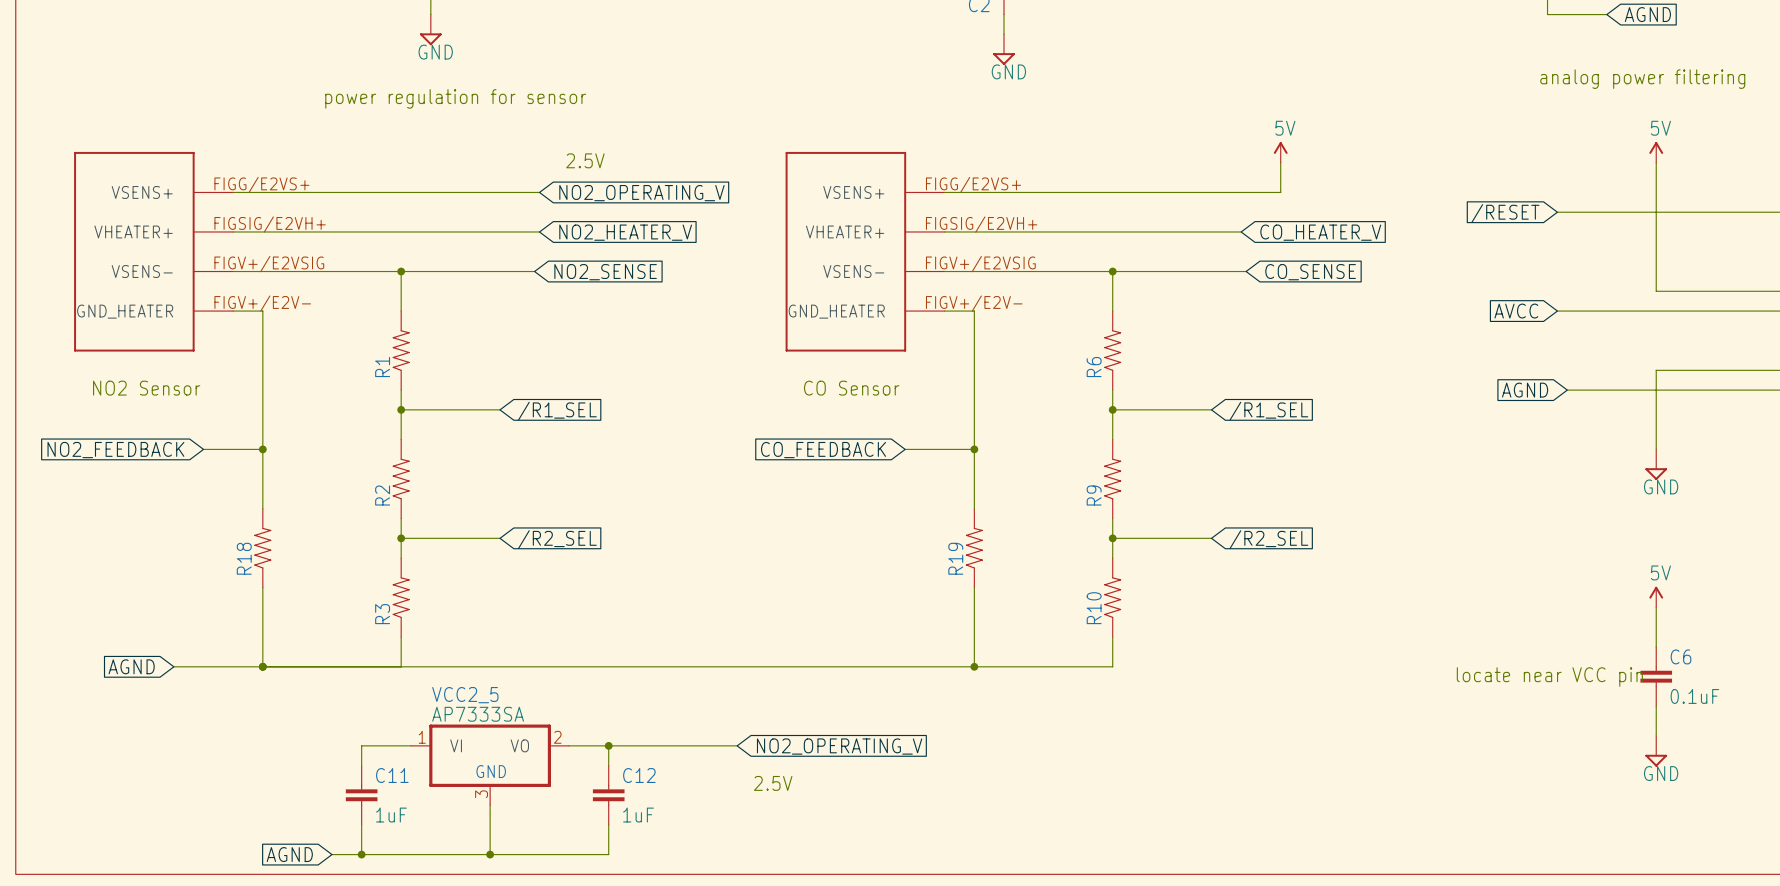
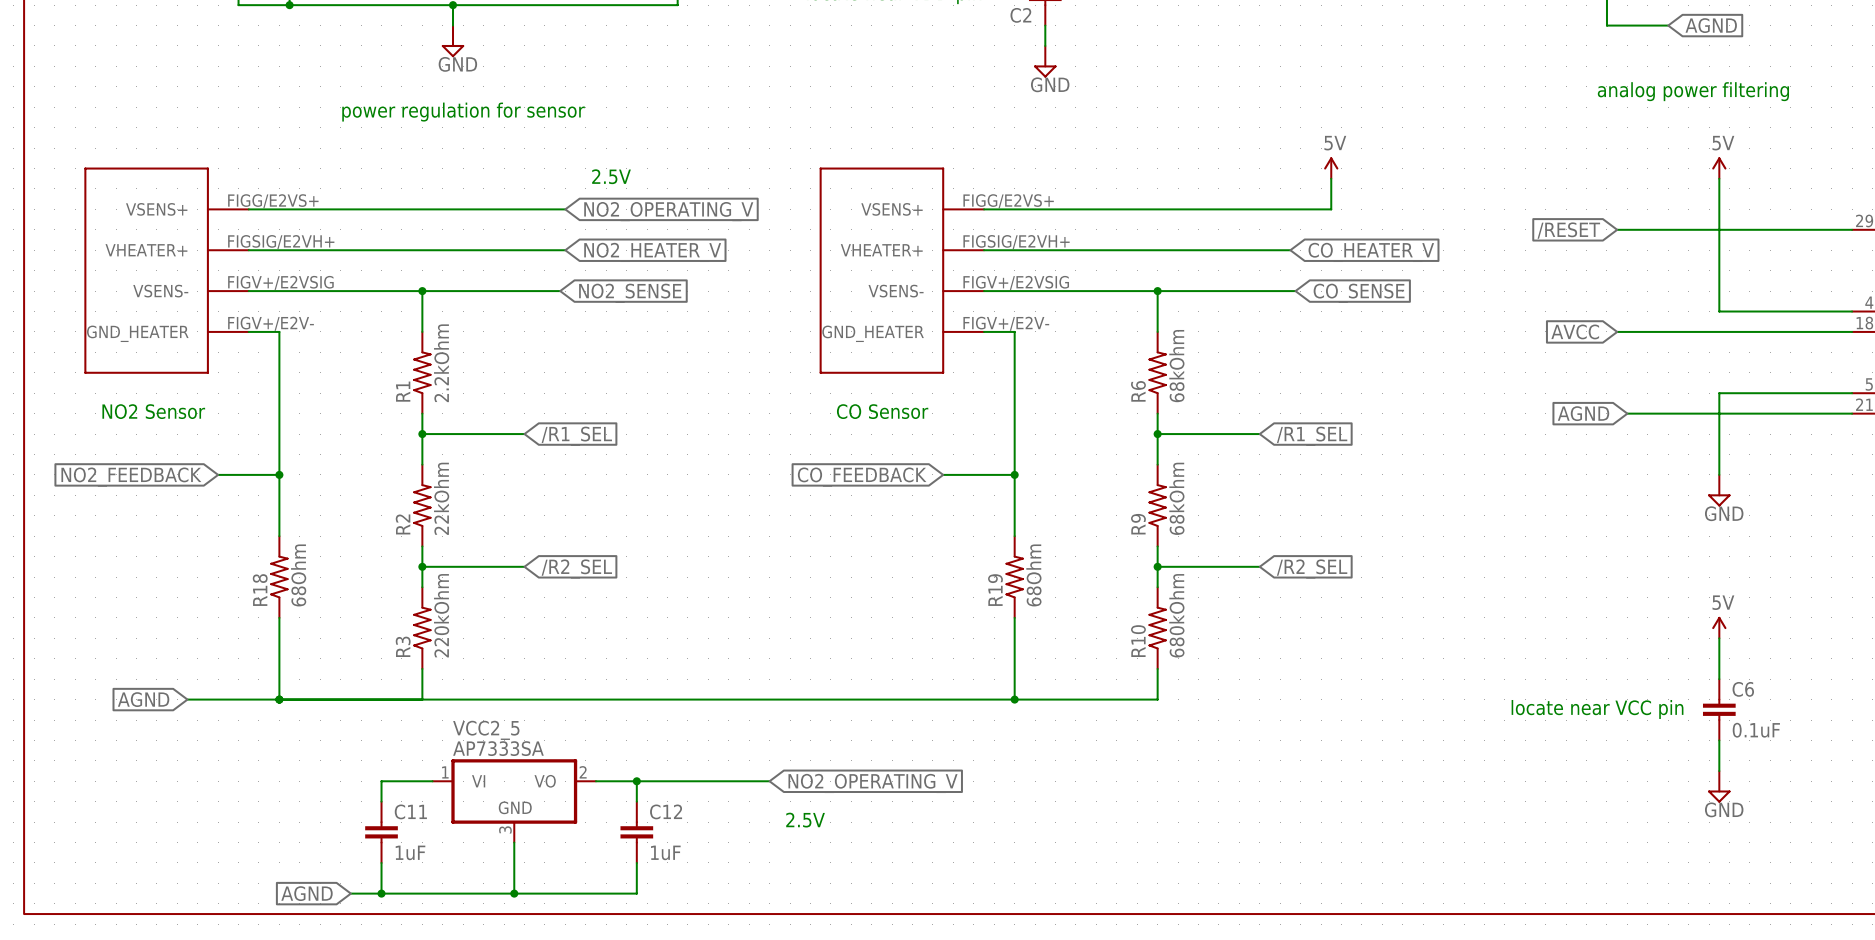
R1 value: none -> 2.2kOhm (441, 363)
R6 value: none -> 68kOhm (1176, 366)
R9 value: none -> 68kOhm (1176, 498)
R2 value: none -> 22kOhm (441, 498)
R18 value: none -> 68Ohm (298, 575)
R19 value: none -> 68Ohm (1033, 575)
R3 value: none -> 220kOhm (441, 615)
R10 value: none -> 680kOhm (1176, 615)

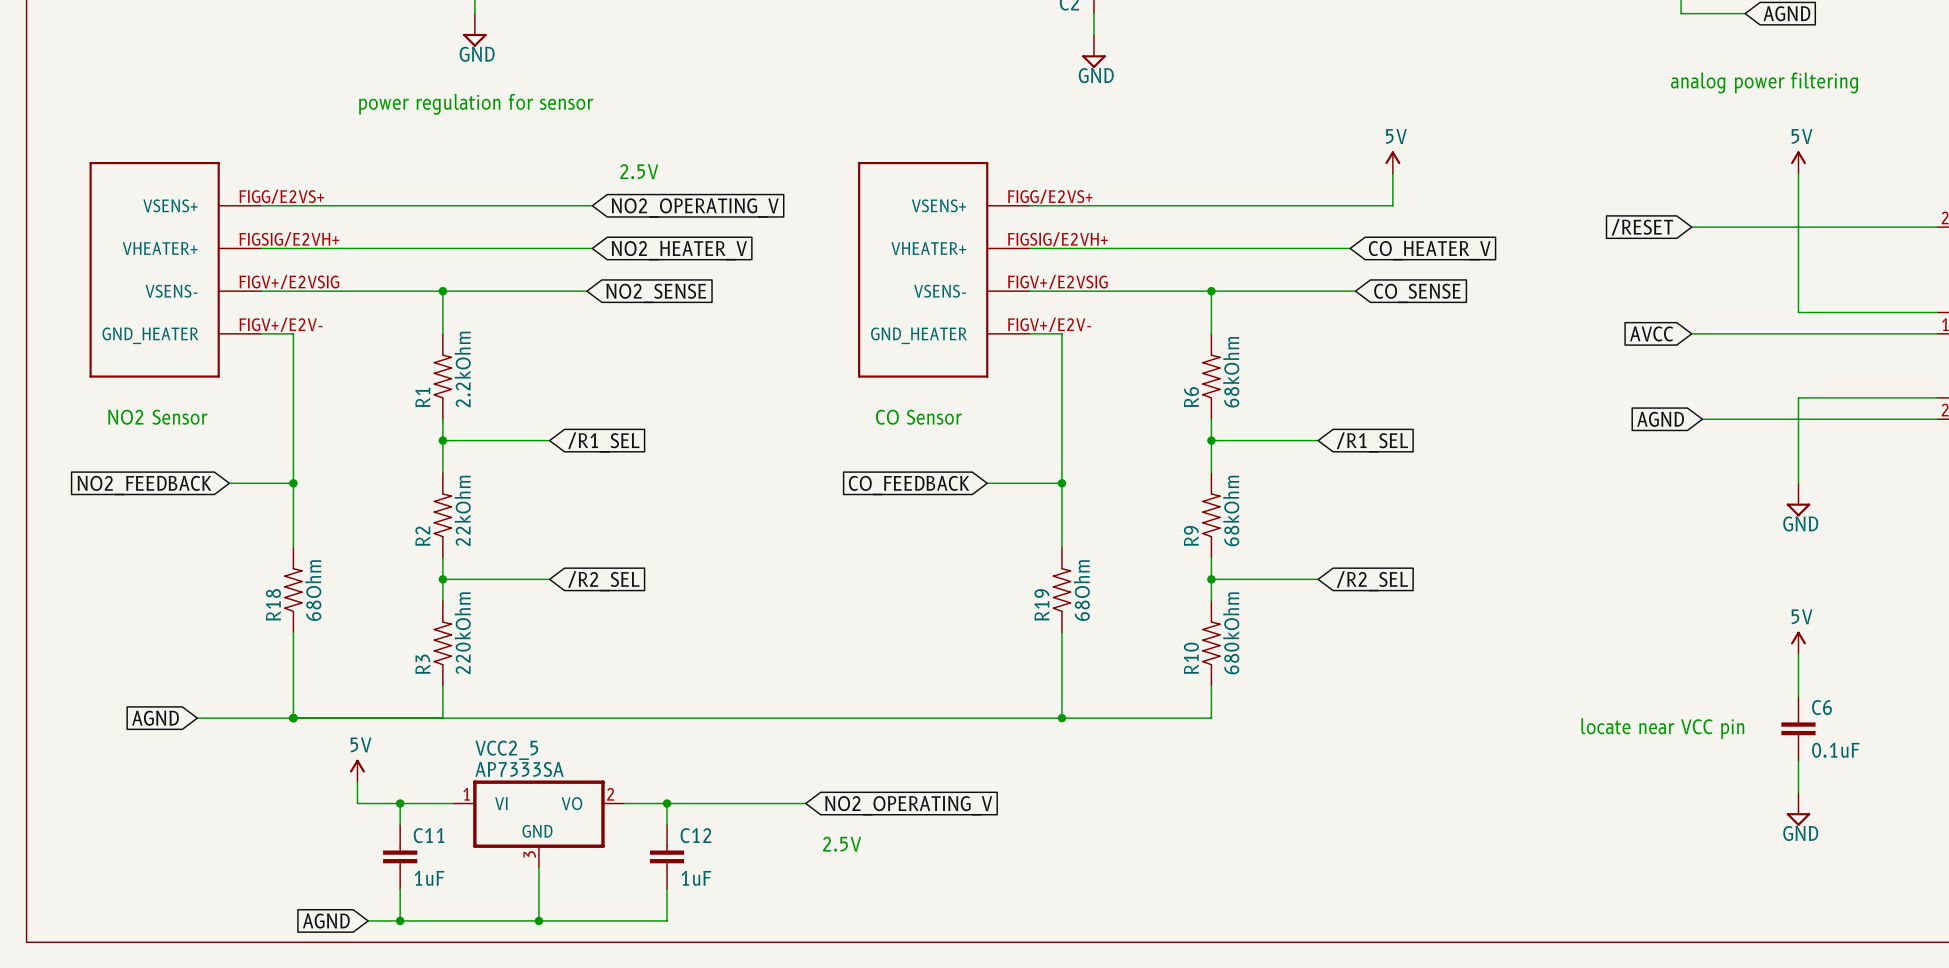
power symbol: none -> 5V (357, 770)
wire: none -> (357, 782) (357, 803) (400, 803)
junction: none -> (400, 803)

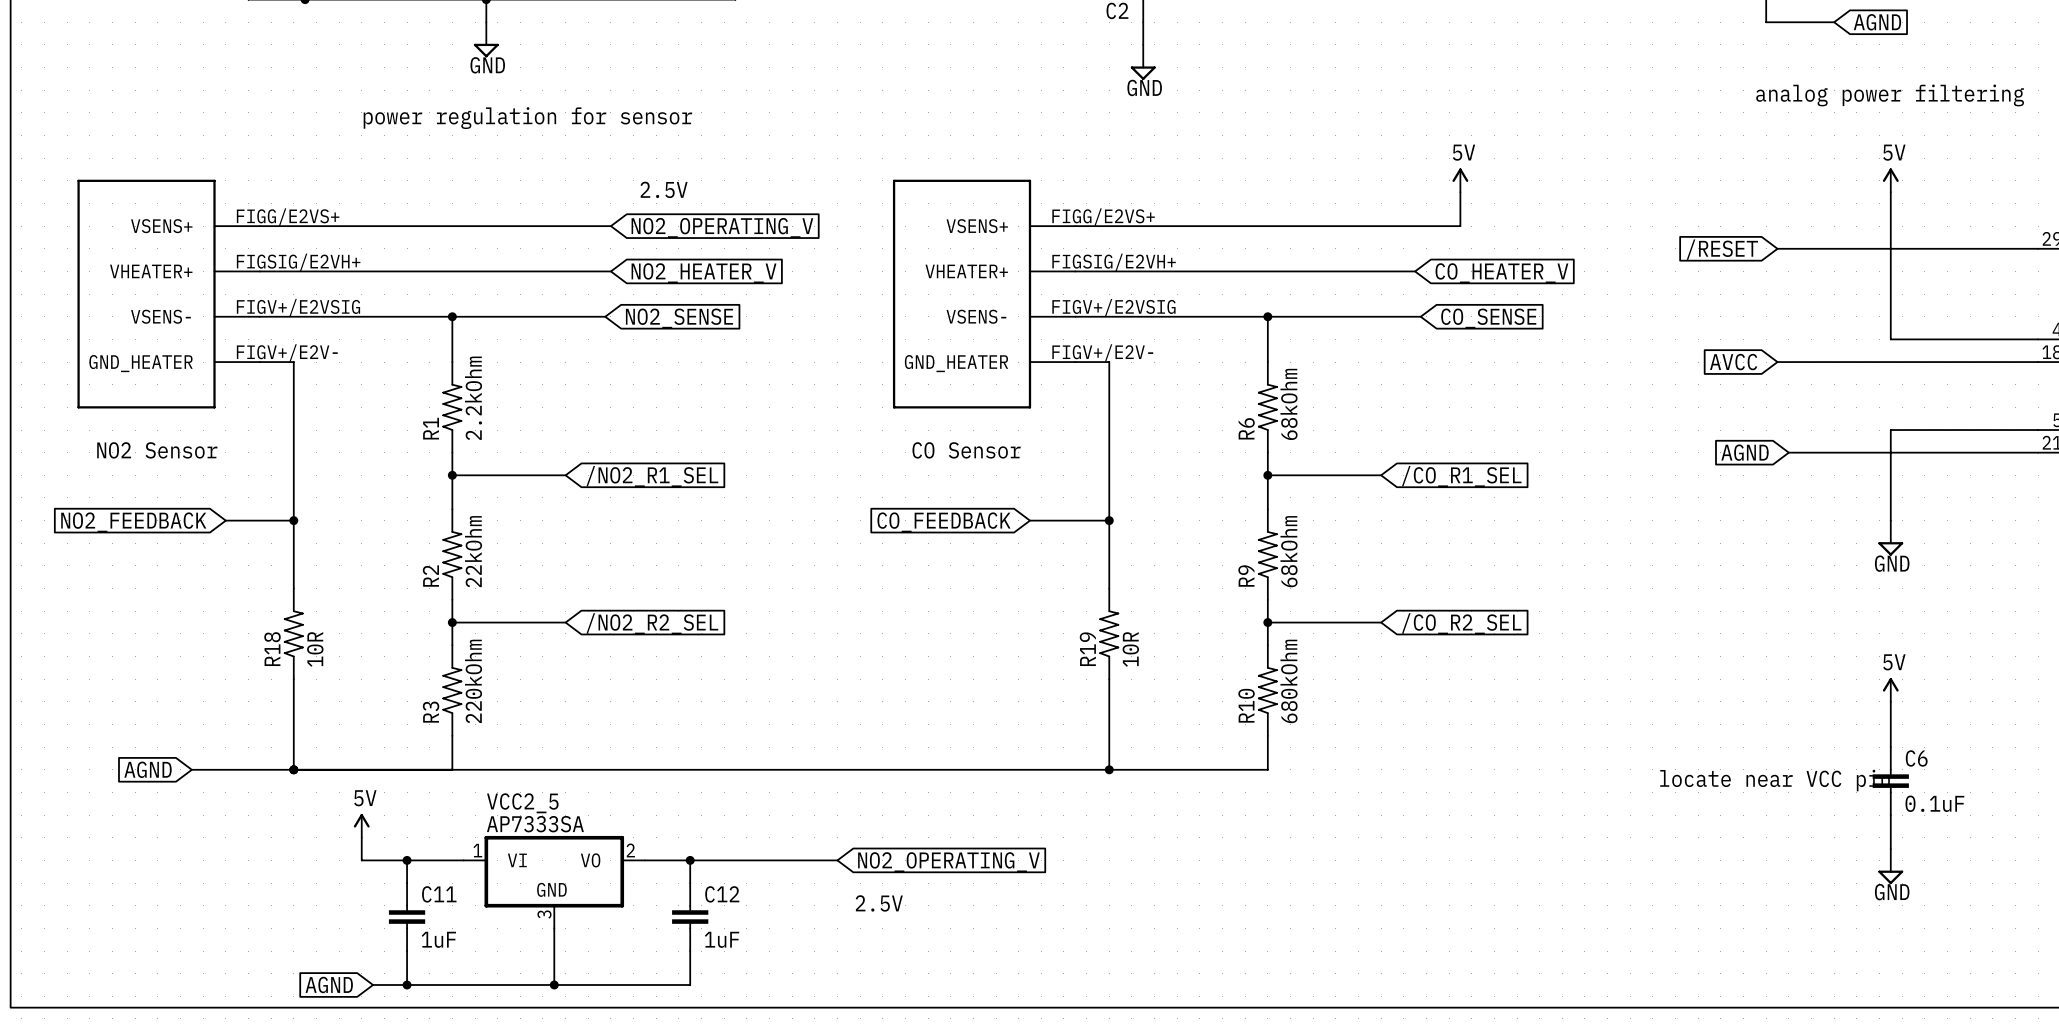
global label: /R1_SEL (603, 442) -> /NO2_R1_SEL (652, 476)
global label: /R1_SEL (1372, 442) -> /CO_R1_SEL (1461, 476)
global label: /R2_SEL (603, 581) -> /NO2_R2_SEL (652, 623)
global label: /R2_SEL (1372, 581) -> /CO_R2_SEL (1461, 623)
R18 value: 68Ohm (313, 590) -> 10R (315, 649)
R19 value: 68Ohm (1081, 590) -> 10R (1130, 649)

